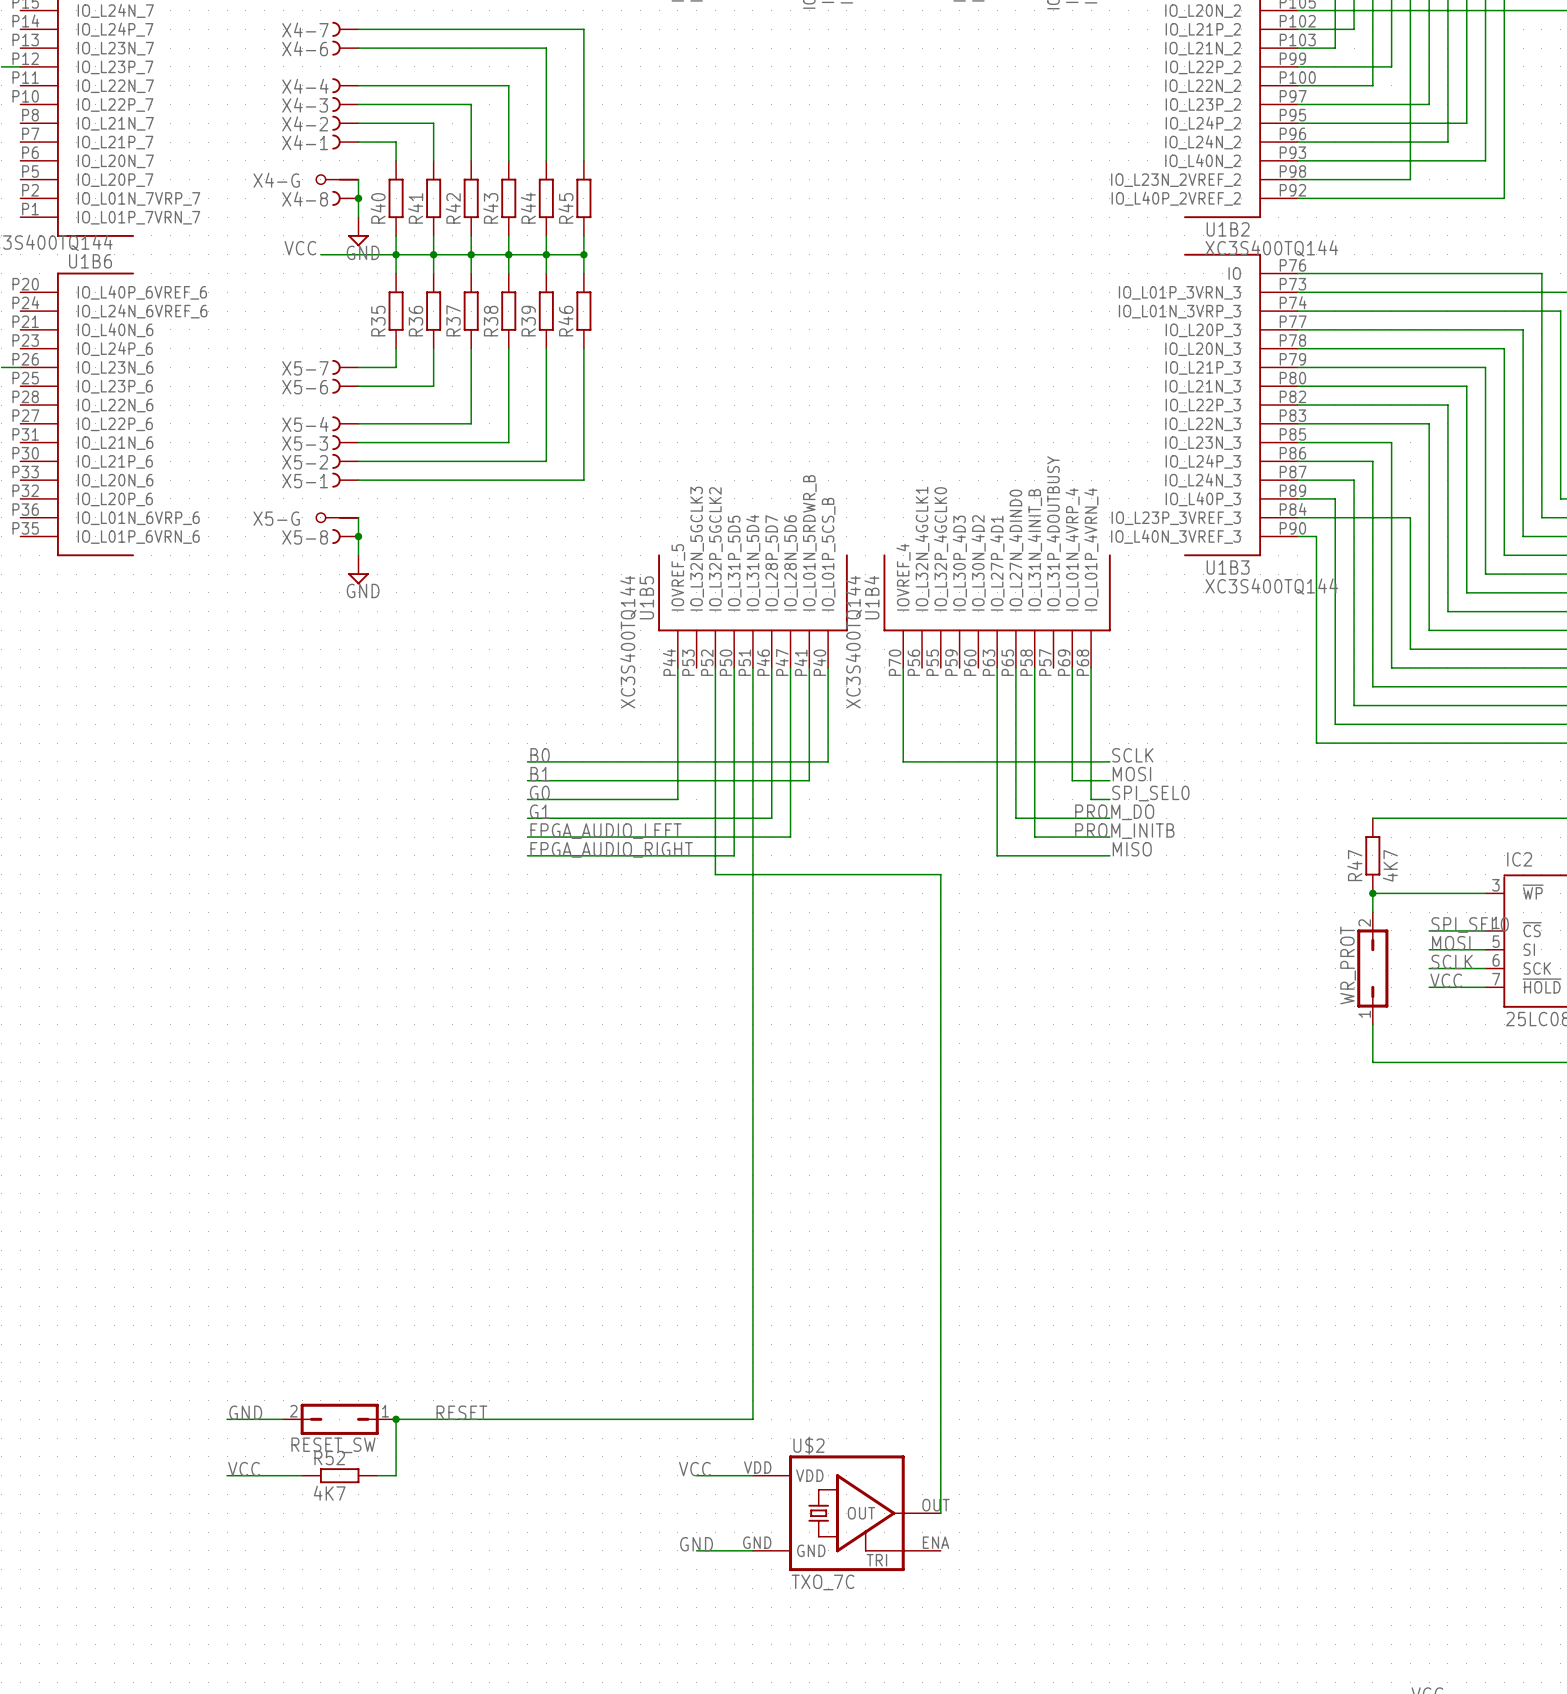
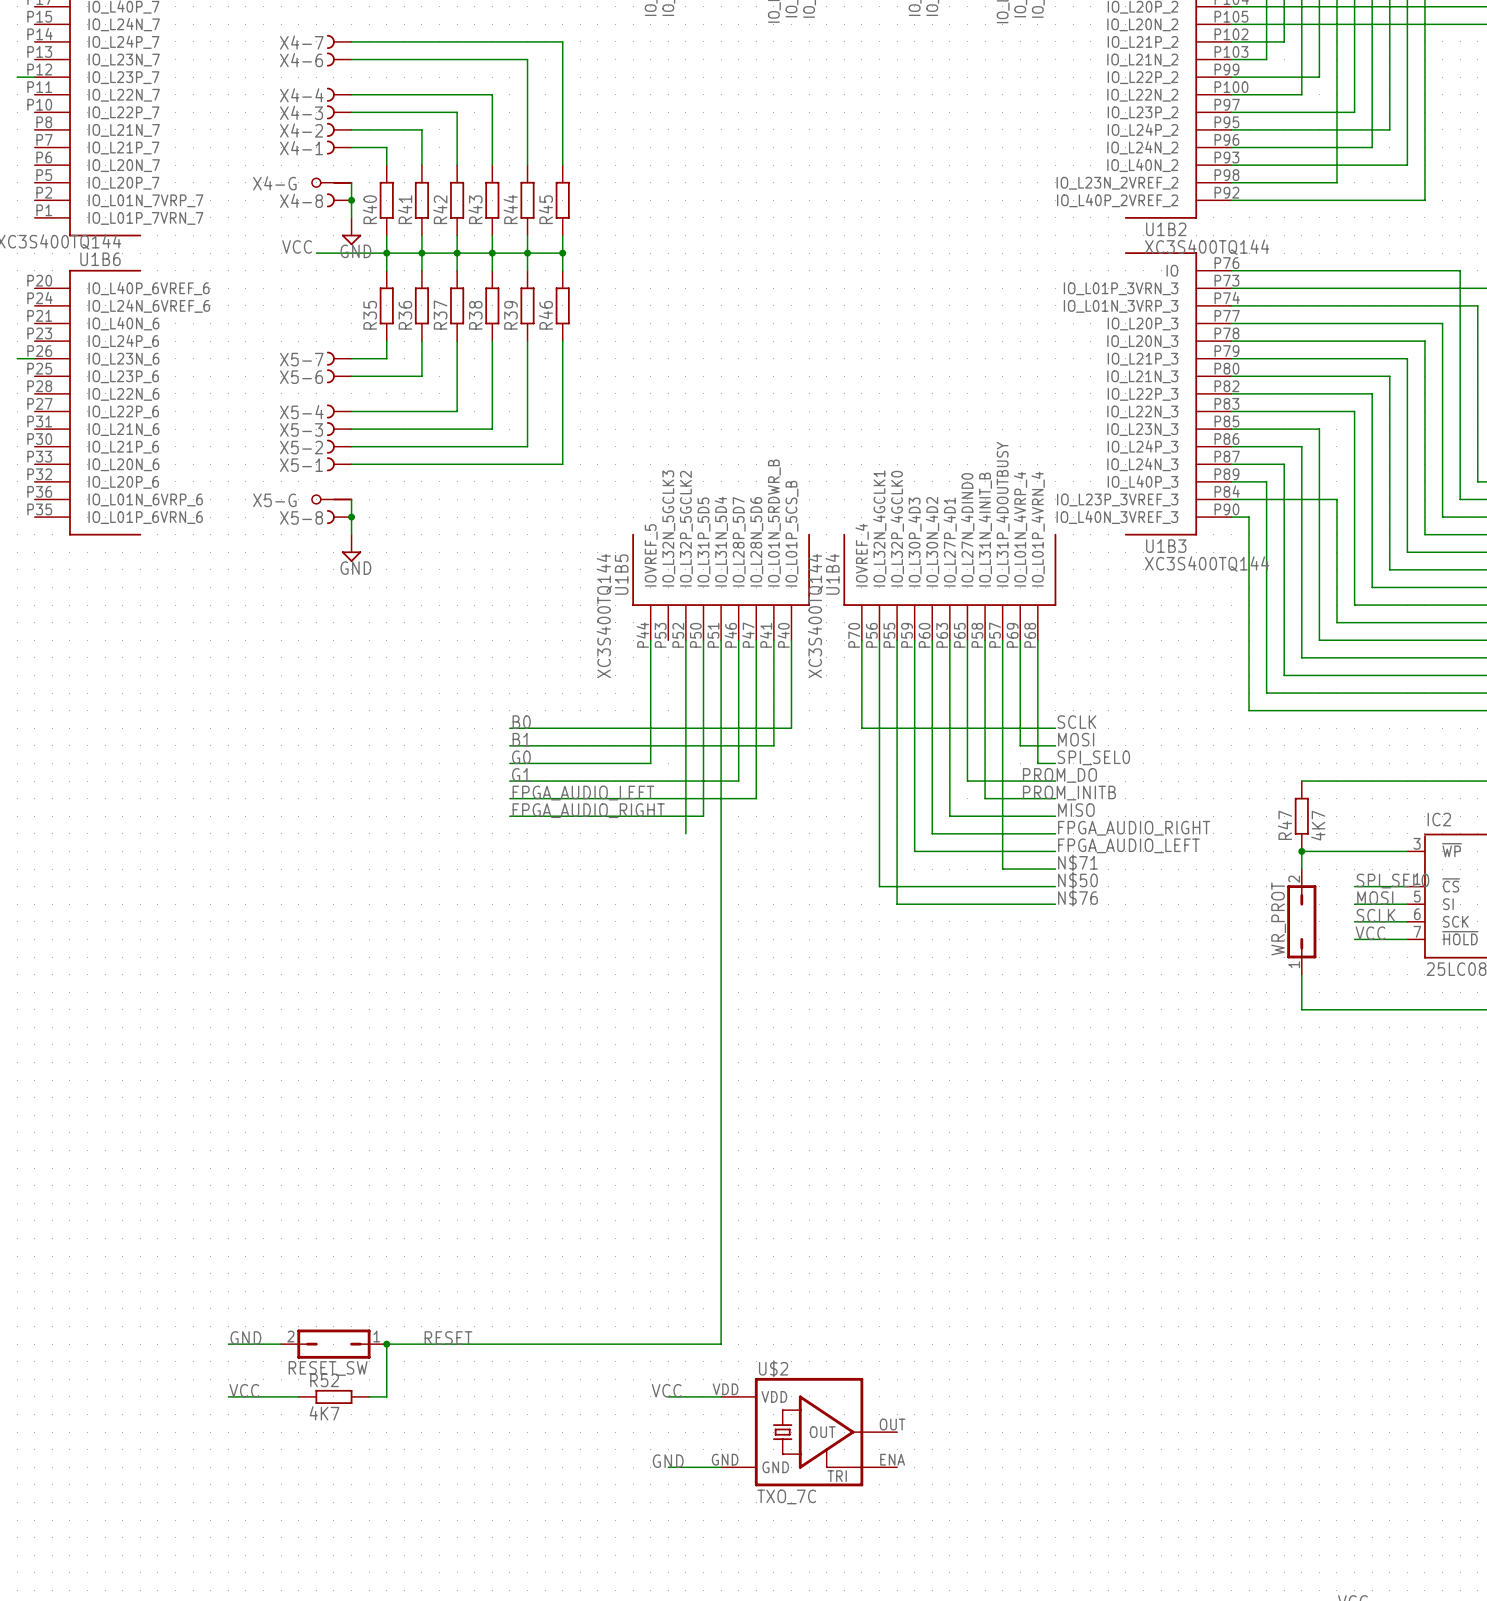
wire: none -> (879, 640) (879, 886) (1055, 886)
wire: none -> (914, 640) (914, 851) (1055, 851)
wire: none -> (932, 640) (932, 833) (1055, 833)
wire: none -> (1002, 640) (1002, 869) (1055, 869)
label: none -> FPGA_AUDIO_RIGHT (1134, 828)
wire: (715, 874) (940, 874) -> (897, 640) (897, 833)
label: none -> FPGA_AUDIO_LEFT (1128, 845)
label: none -> N$71 (1077, 862)
label: none -> N$50 (1077, 880)
label: none -> N$76 (1077, 898)
wire: (940, 949) (940, 1513) -> (897, 904) (1055, 904)

